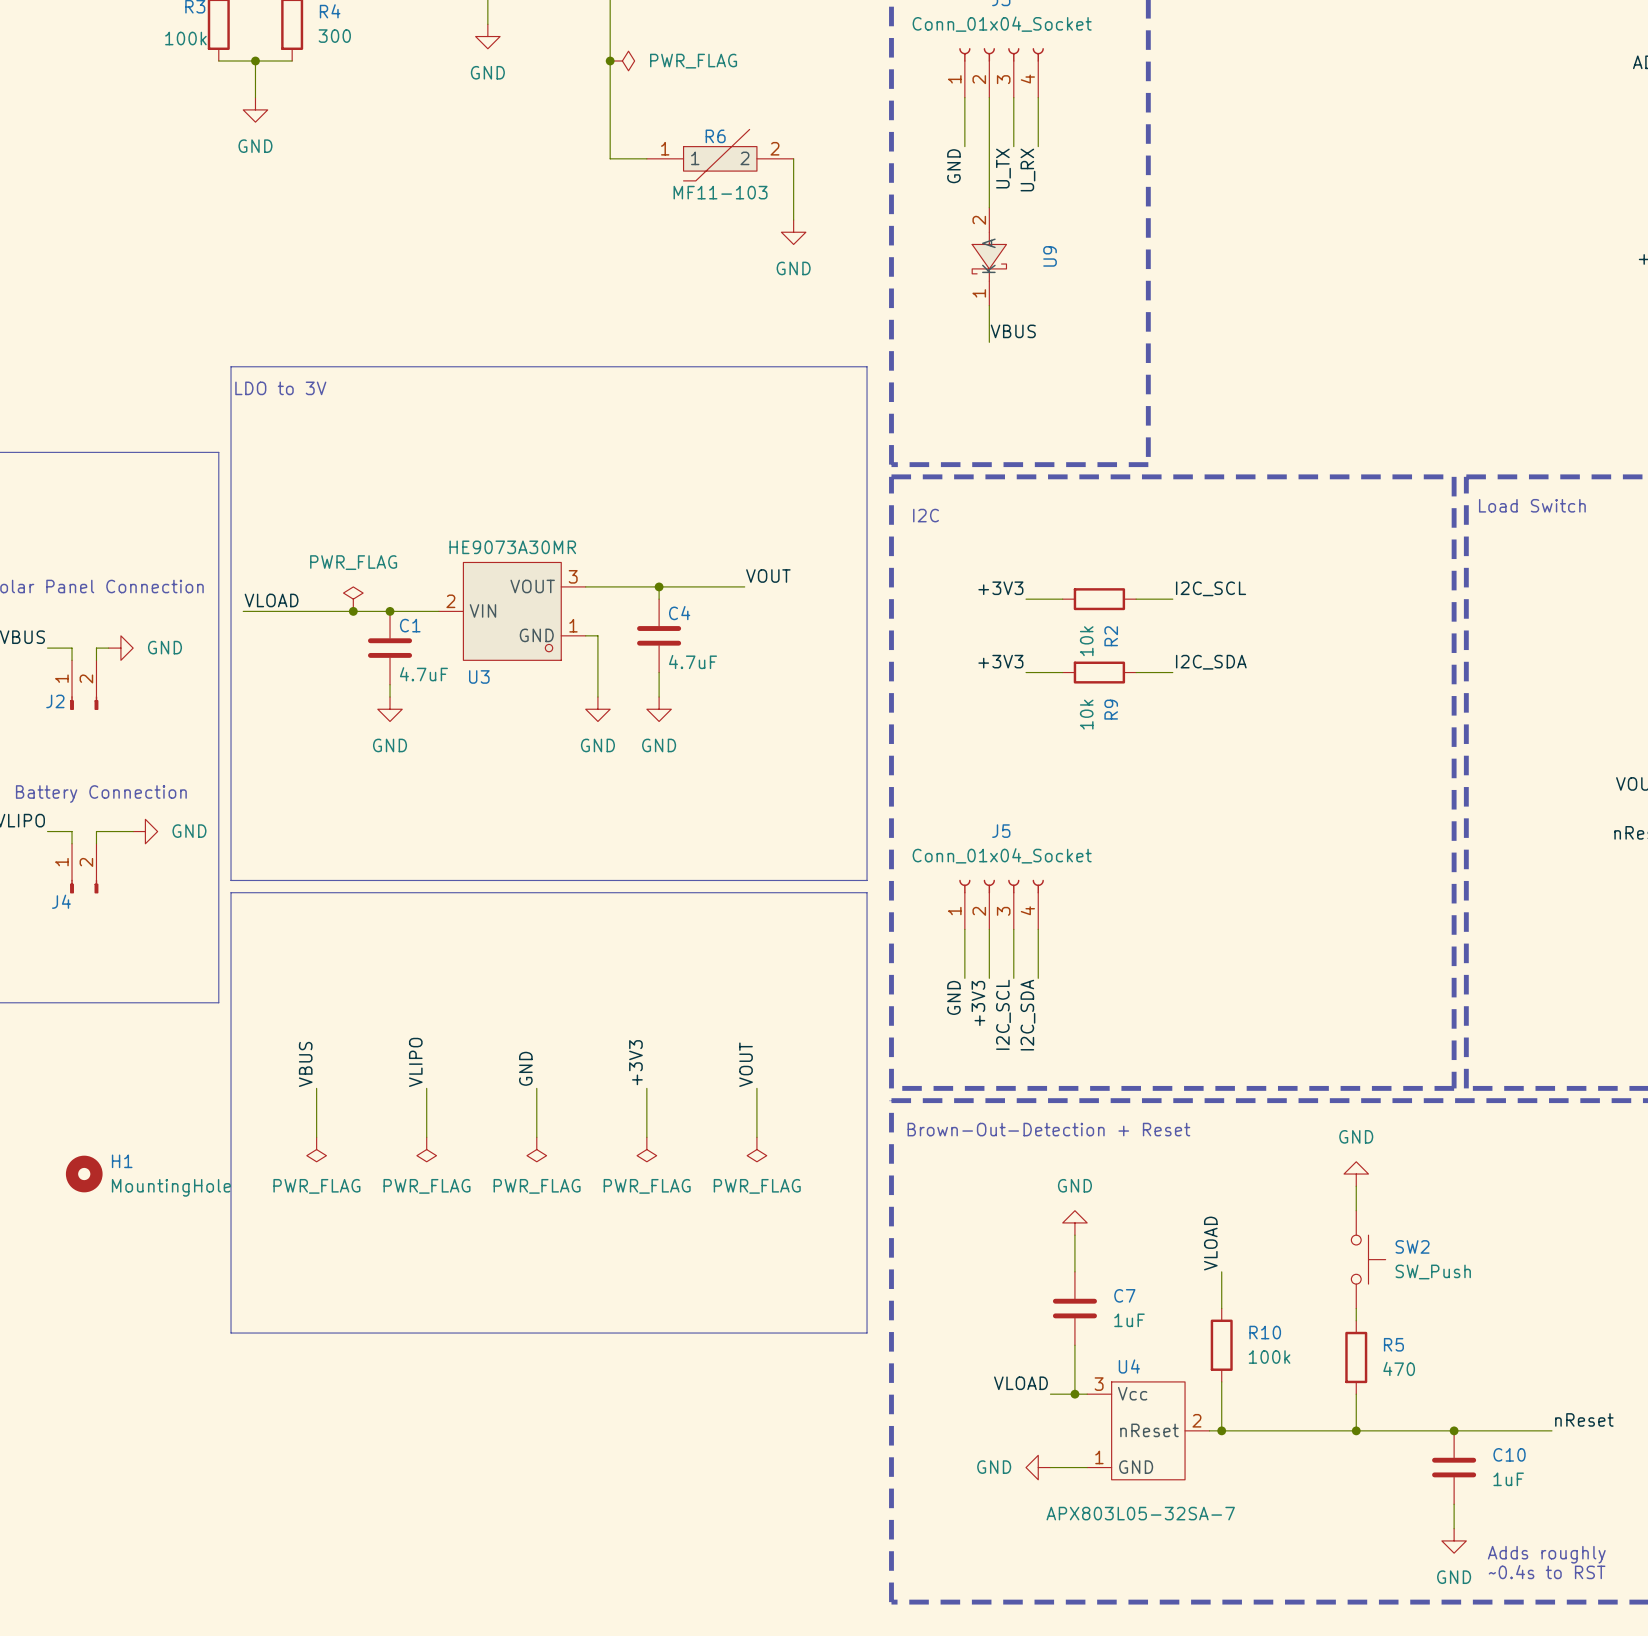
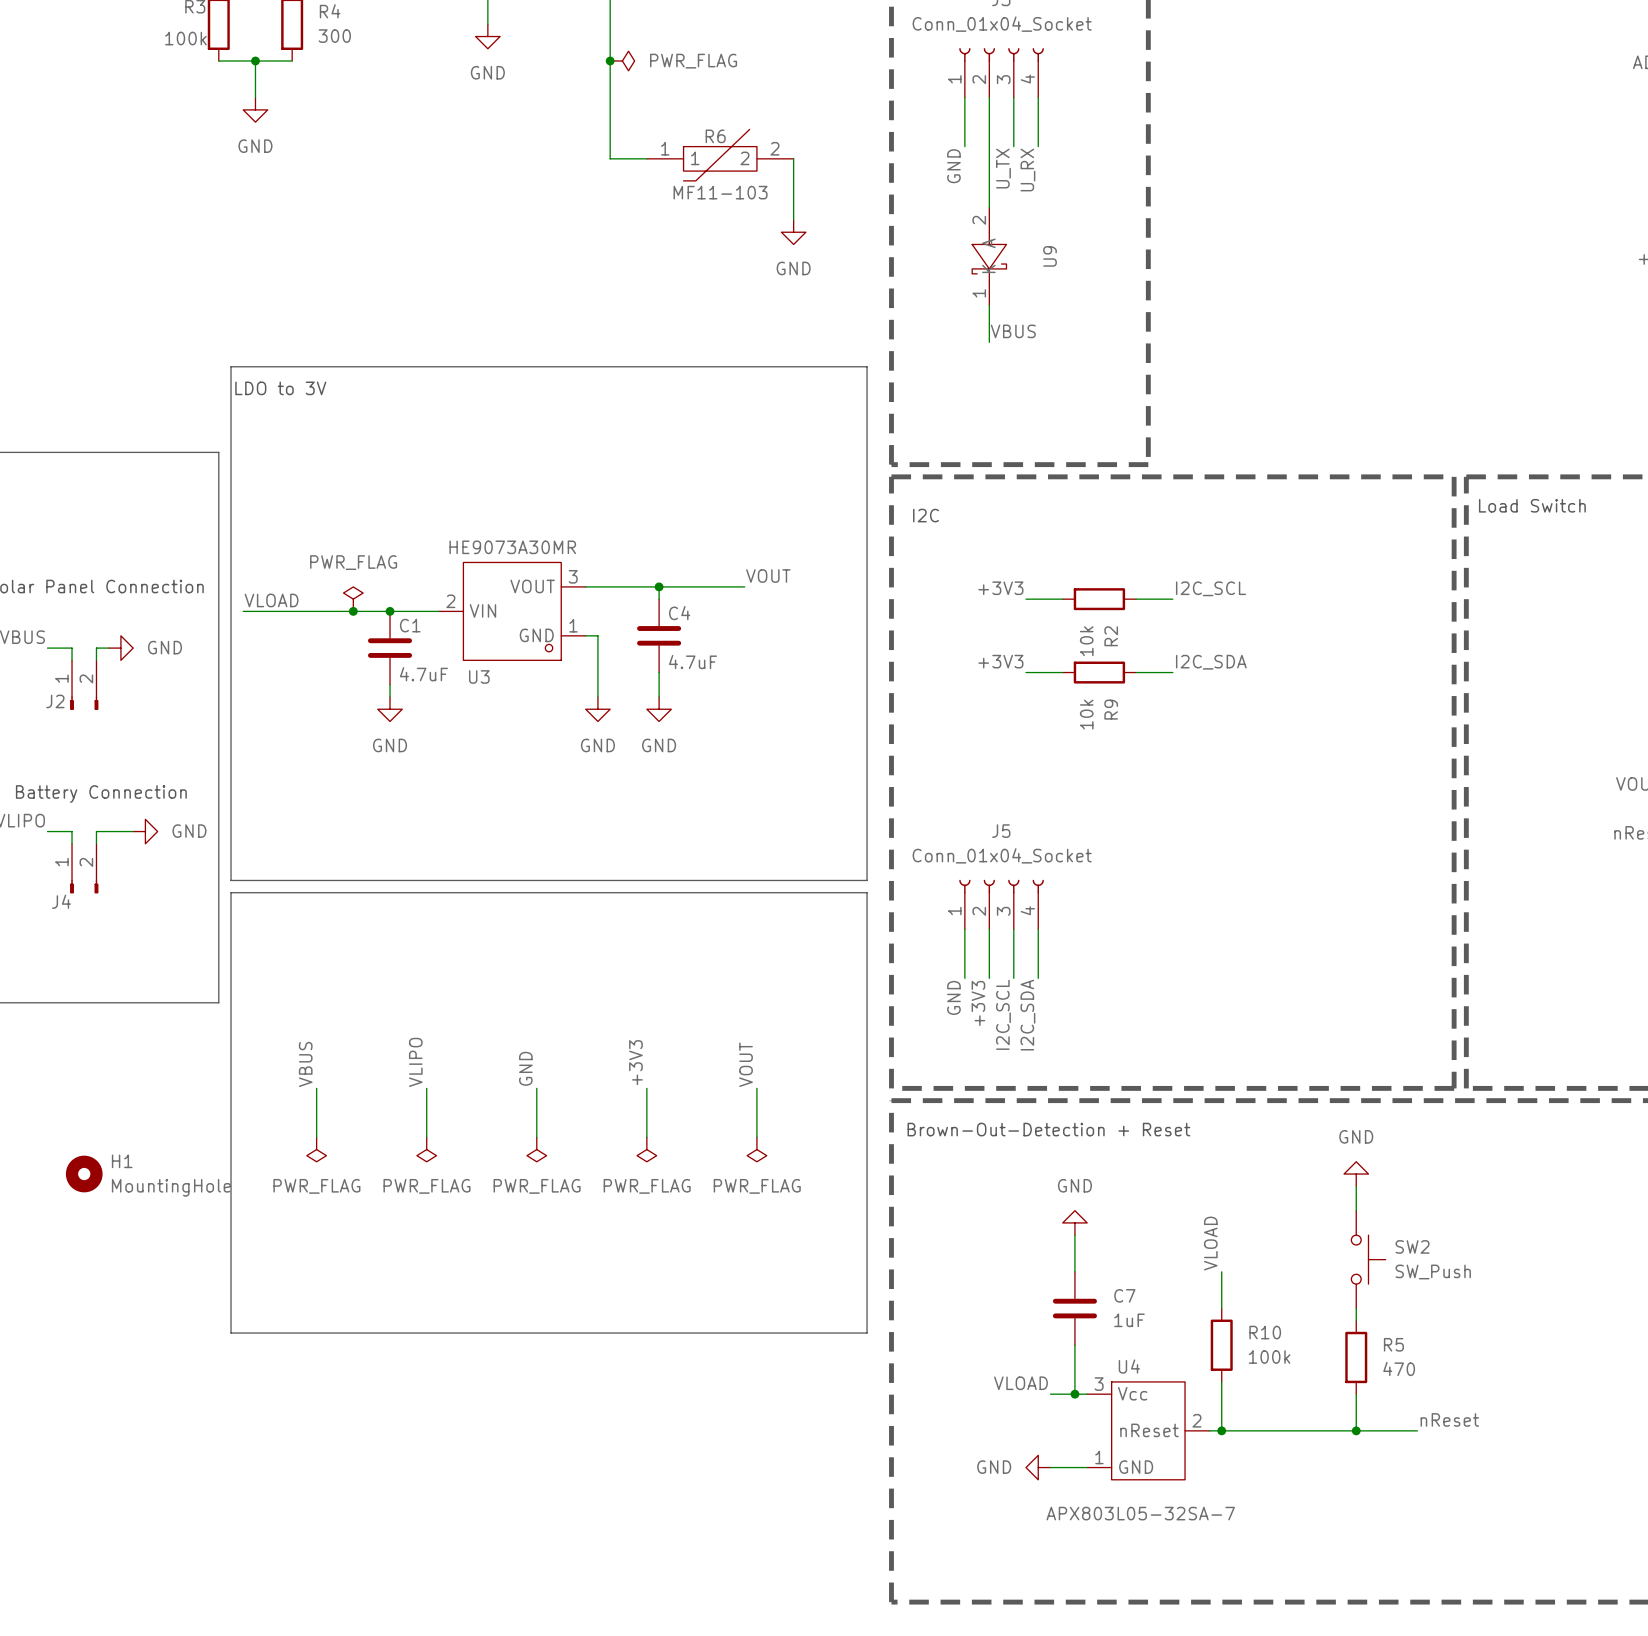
label position: nReset (1584, 1419) -> nReset (1449, 1419)
wire: (1417, 1430) (1551, 1430) -> none
junction: (1454, 1430) -> none
C10: 1uF (1454, 1467) -> none
wire: (1454, 1504) (1454, 1528) -> none
power symbol: GND (1454, 1540) -> none
text: Adds roughly (1546, 1554) -> none
text: ~0.4s to RST (1547, 1572) -> none

